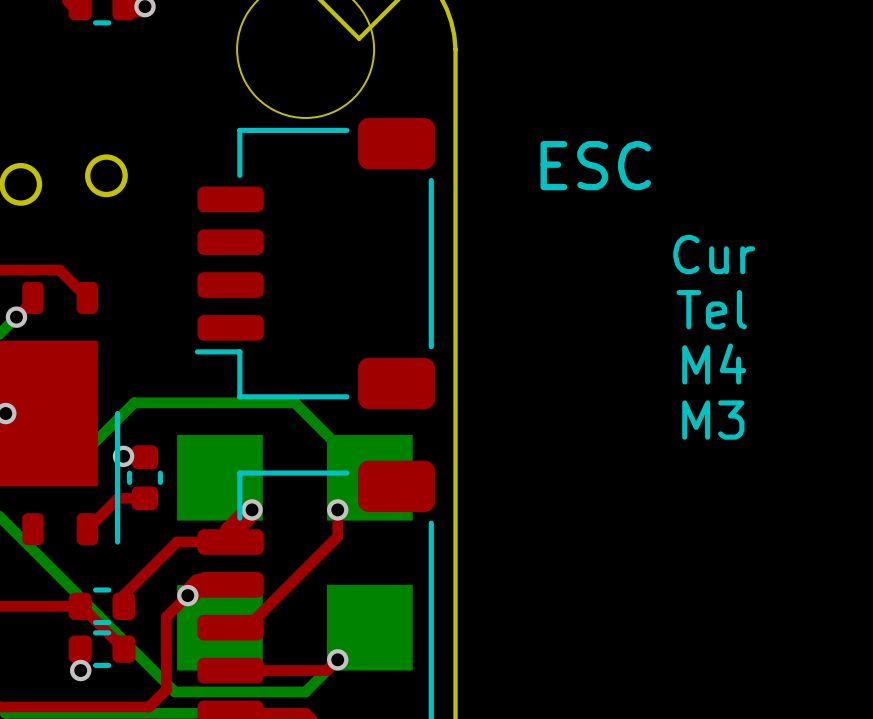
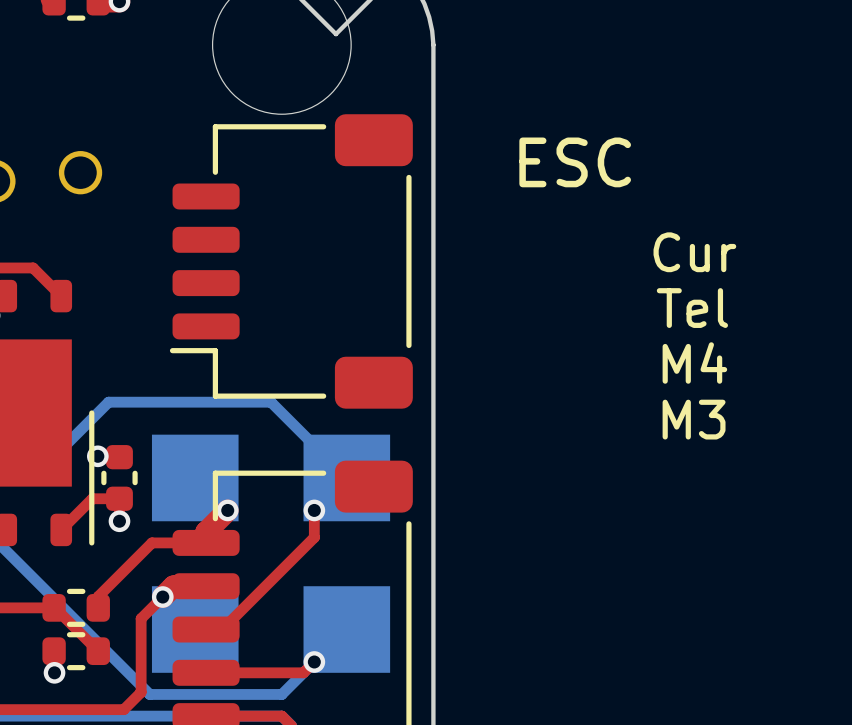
via: none -> (119, 521)

